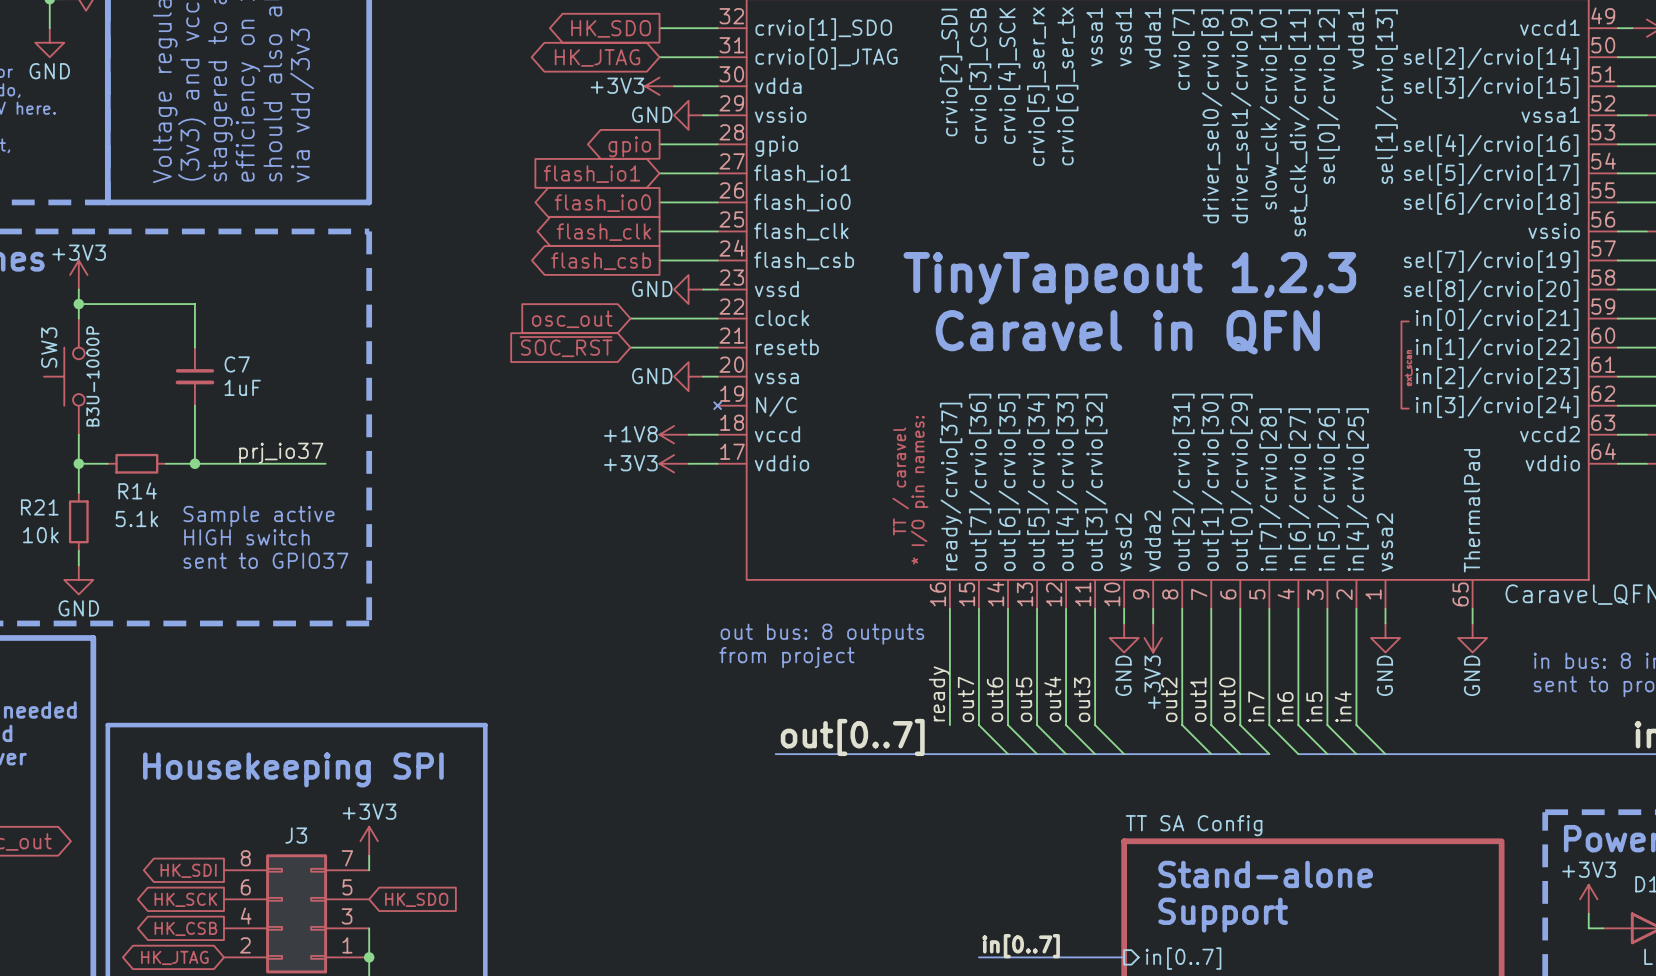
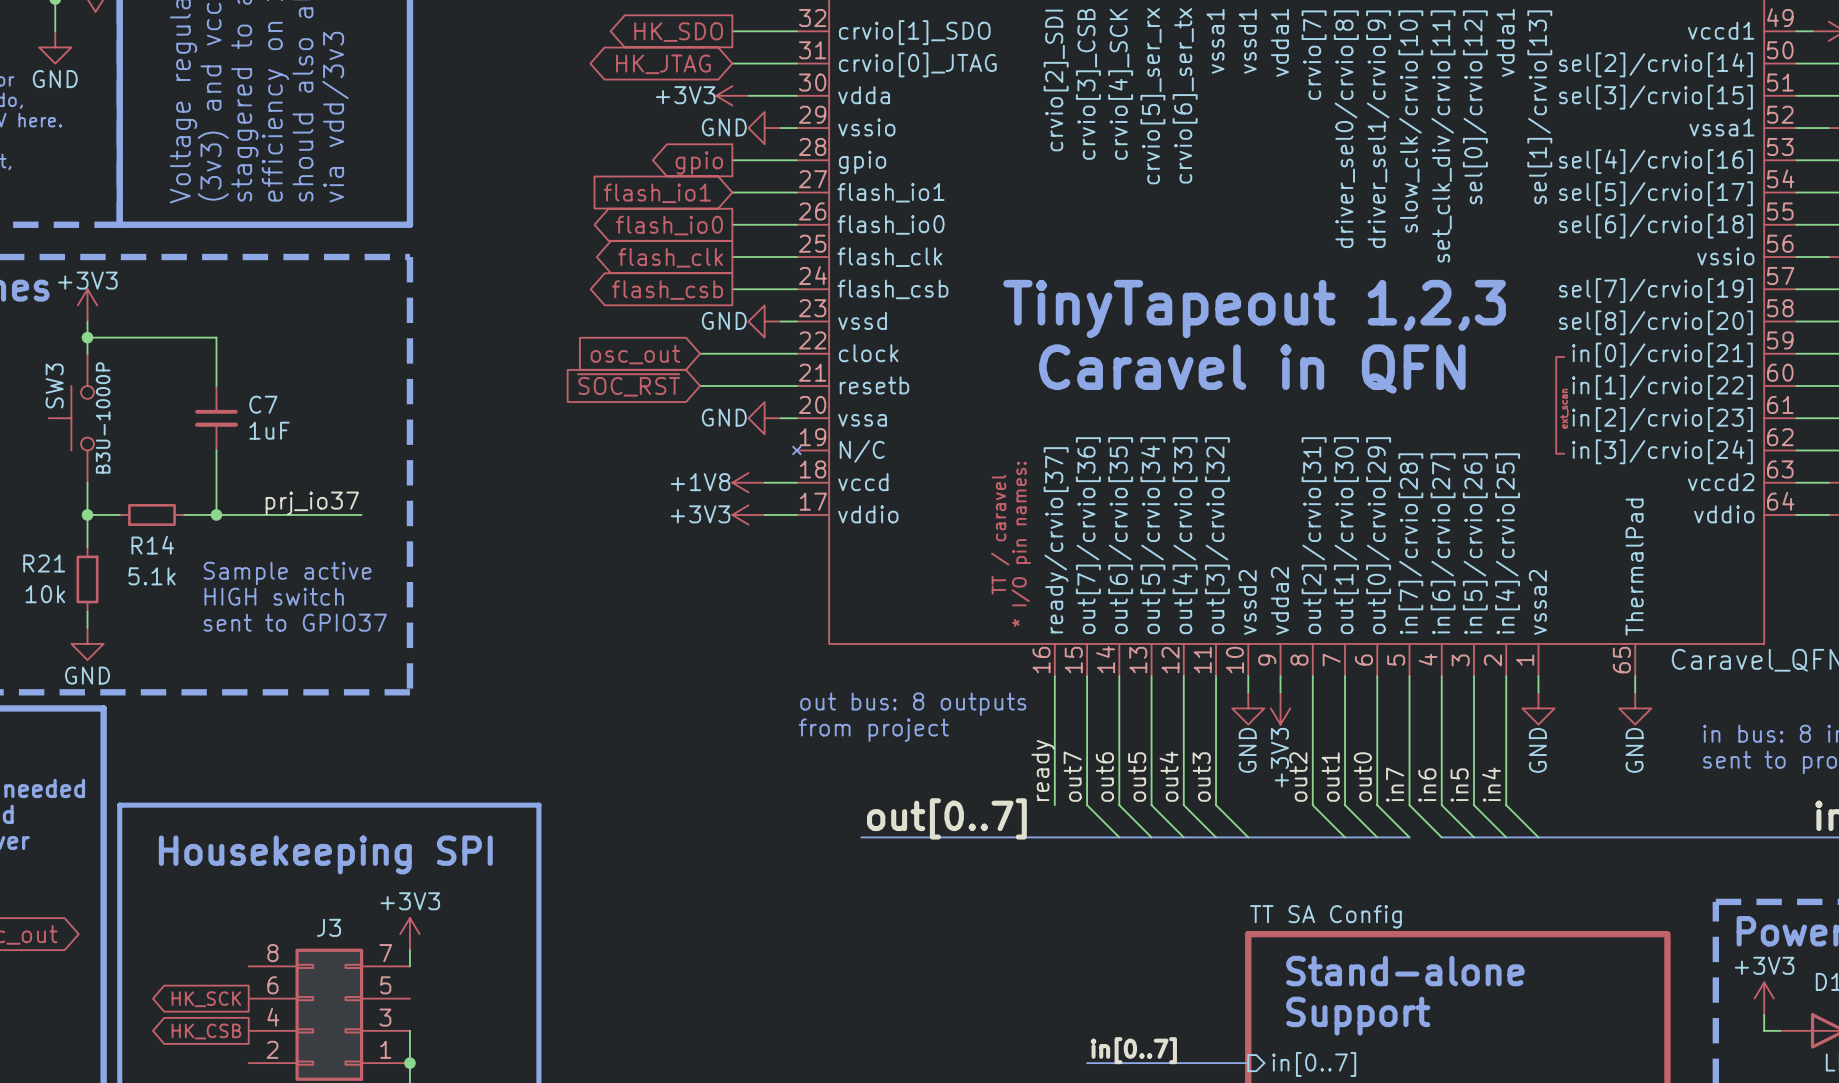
global label: HK_SDI (188, 870) -> none
global label: HK_SDO (416, 899) -> none
global label: HK_JTAG (174, 957) -> none

